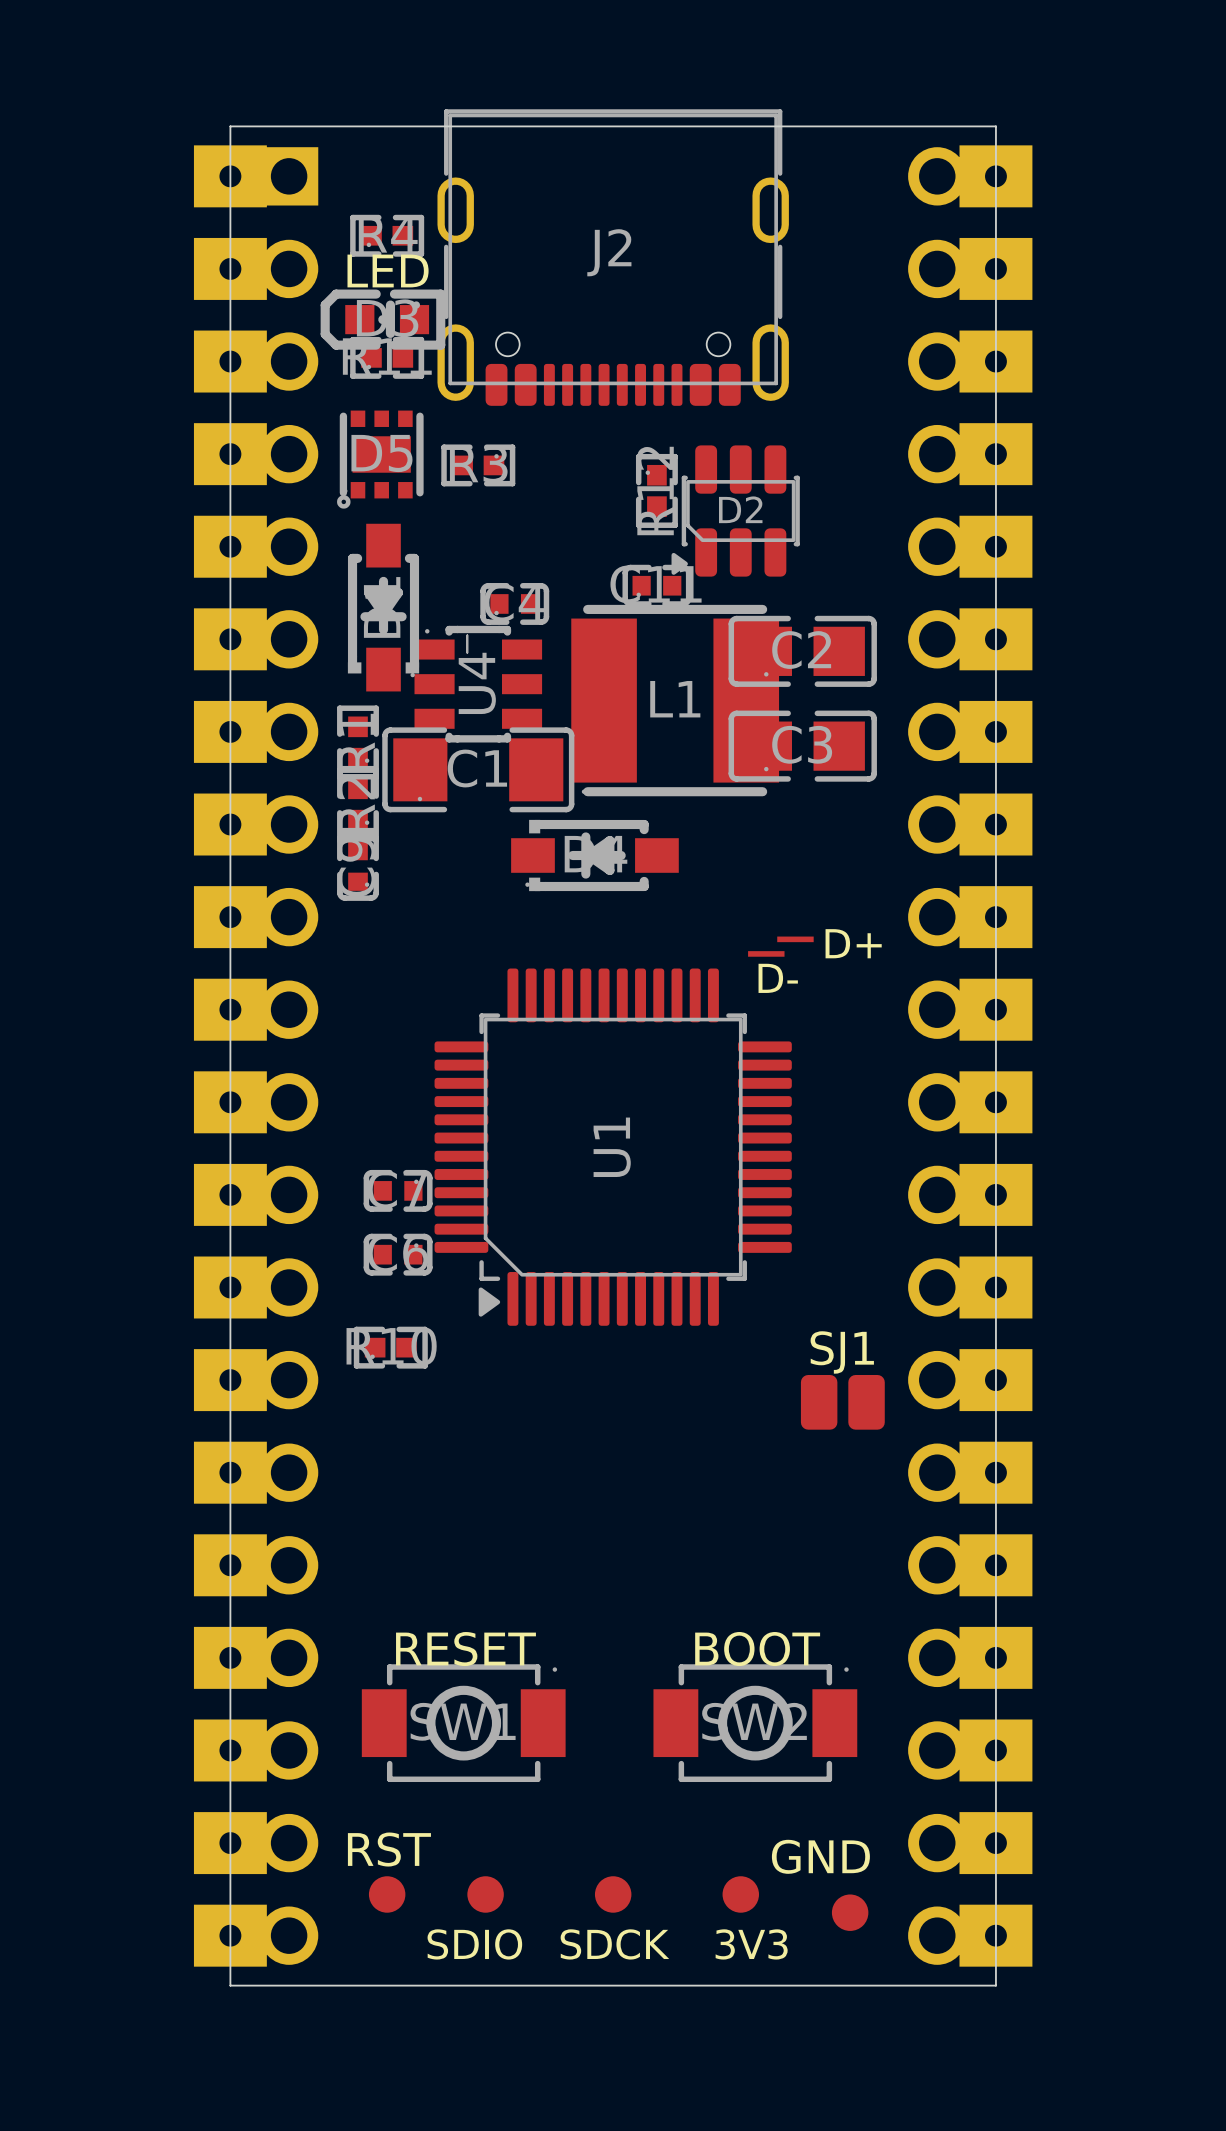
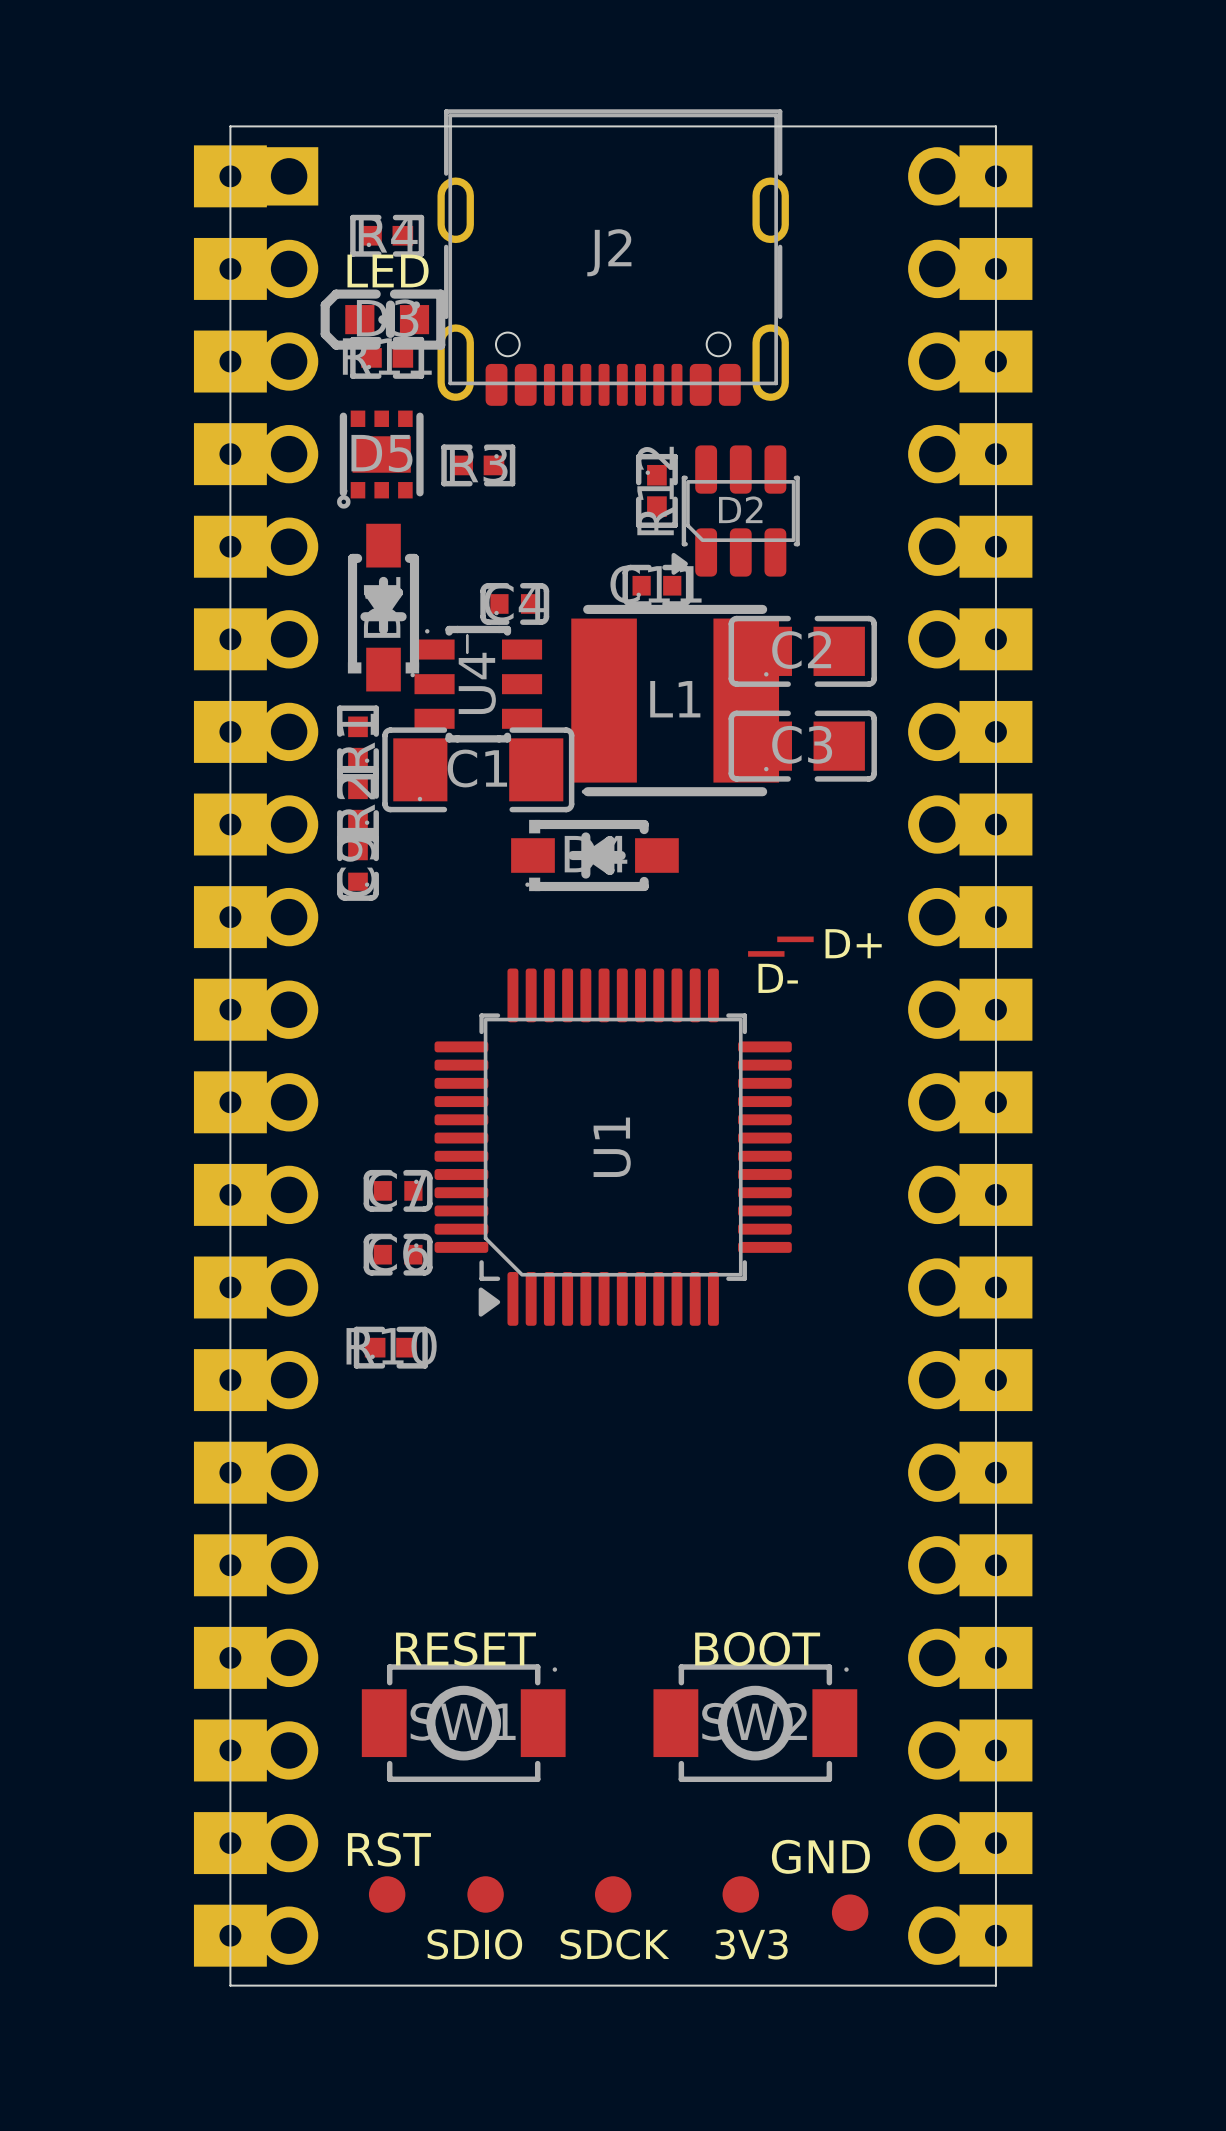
text: SJ1 (842, 1352) -> none
part: (842, 1402) -> none

